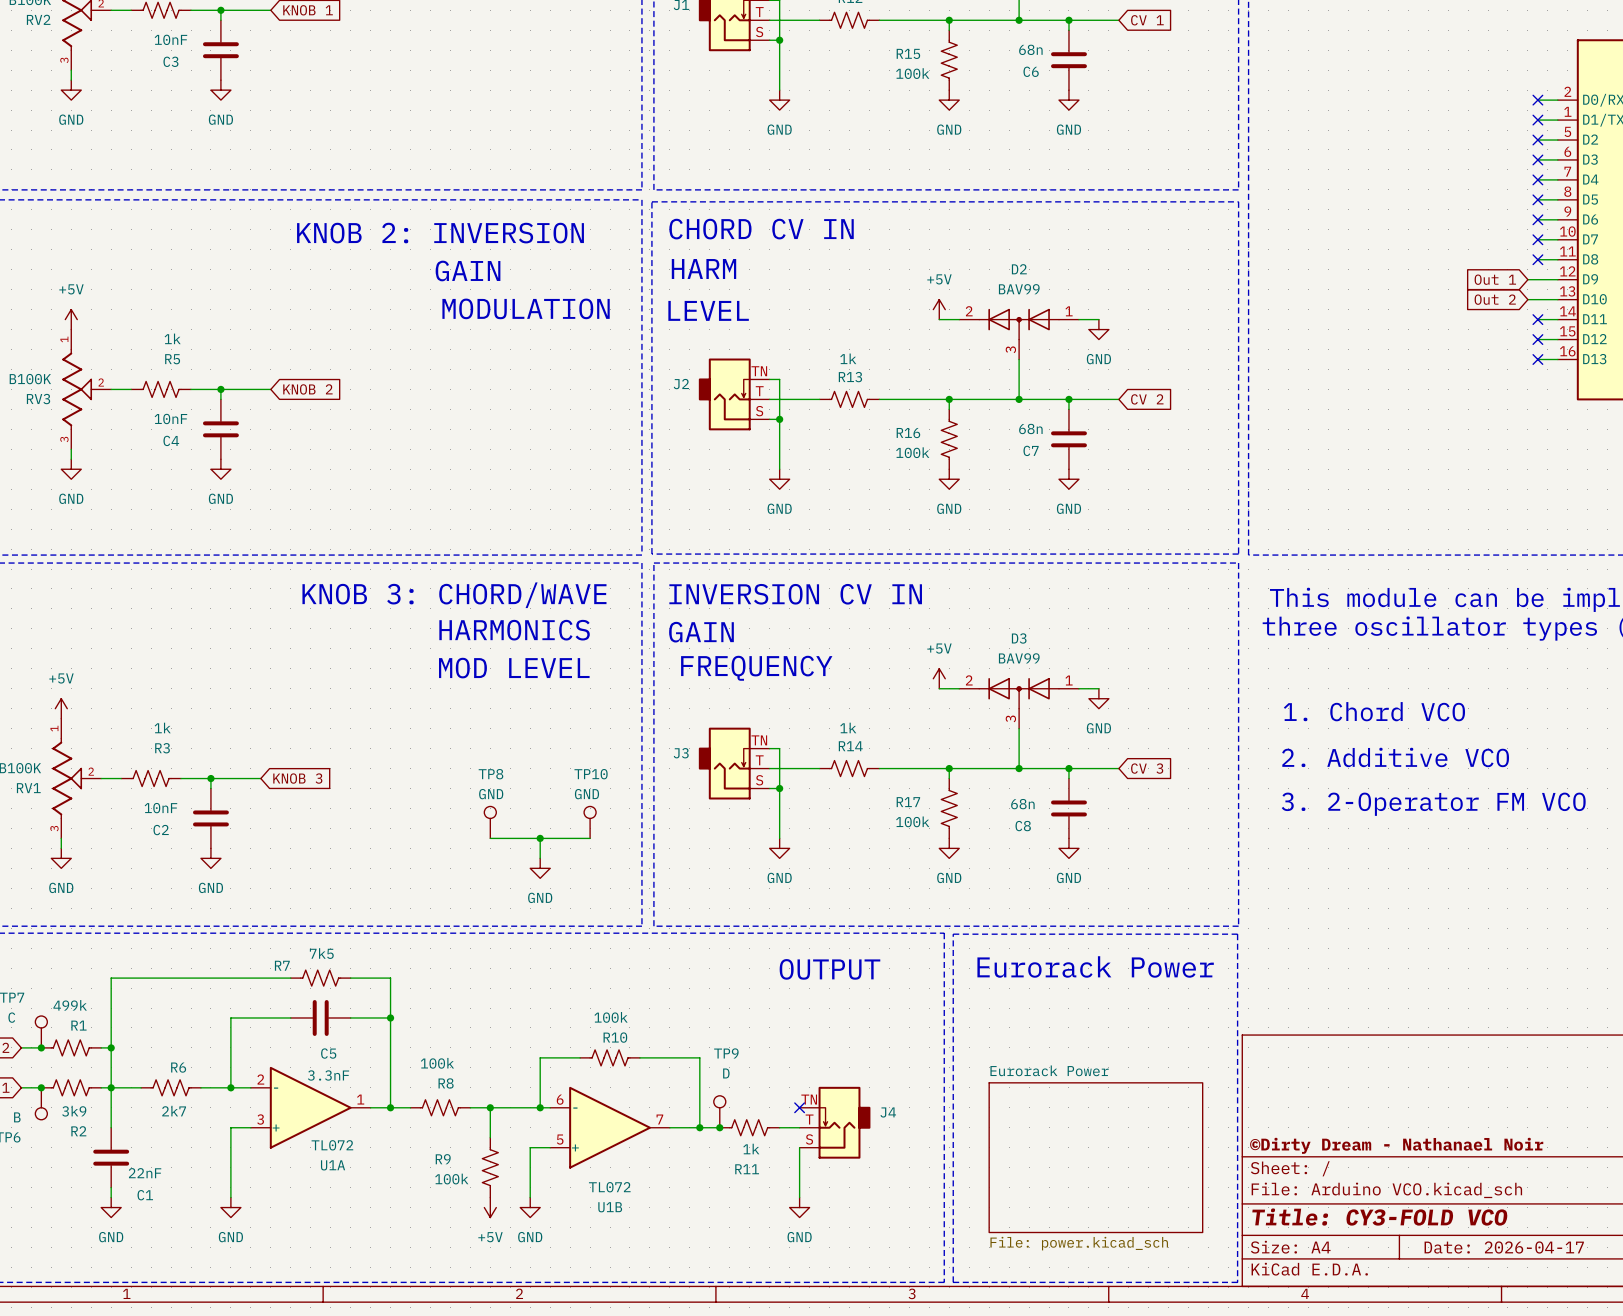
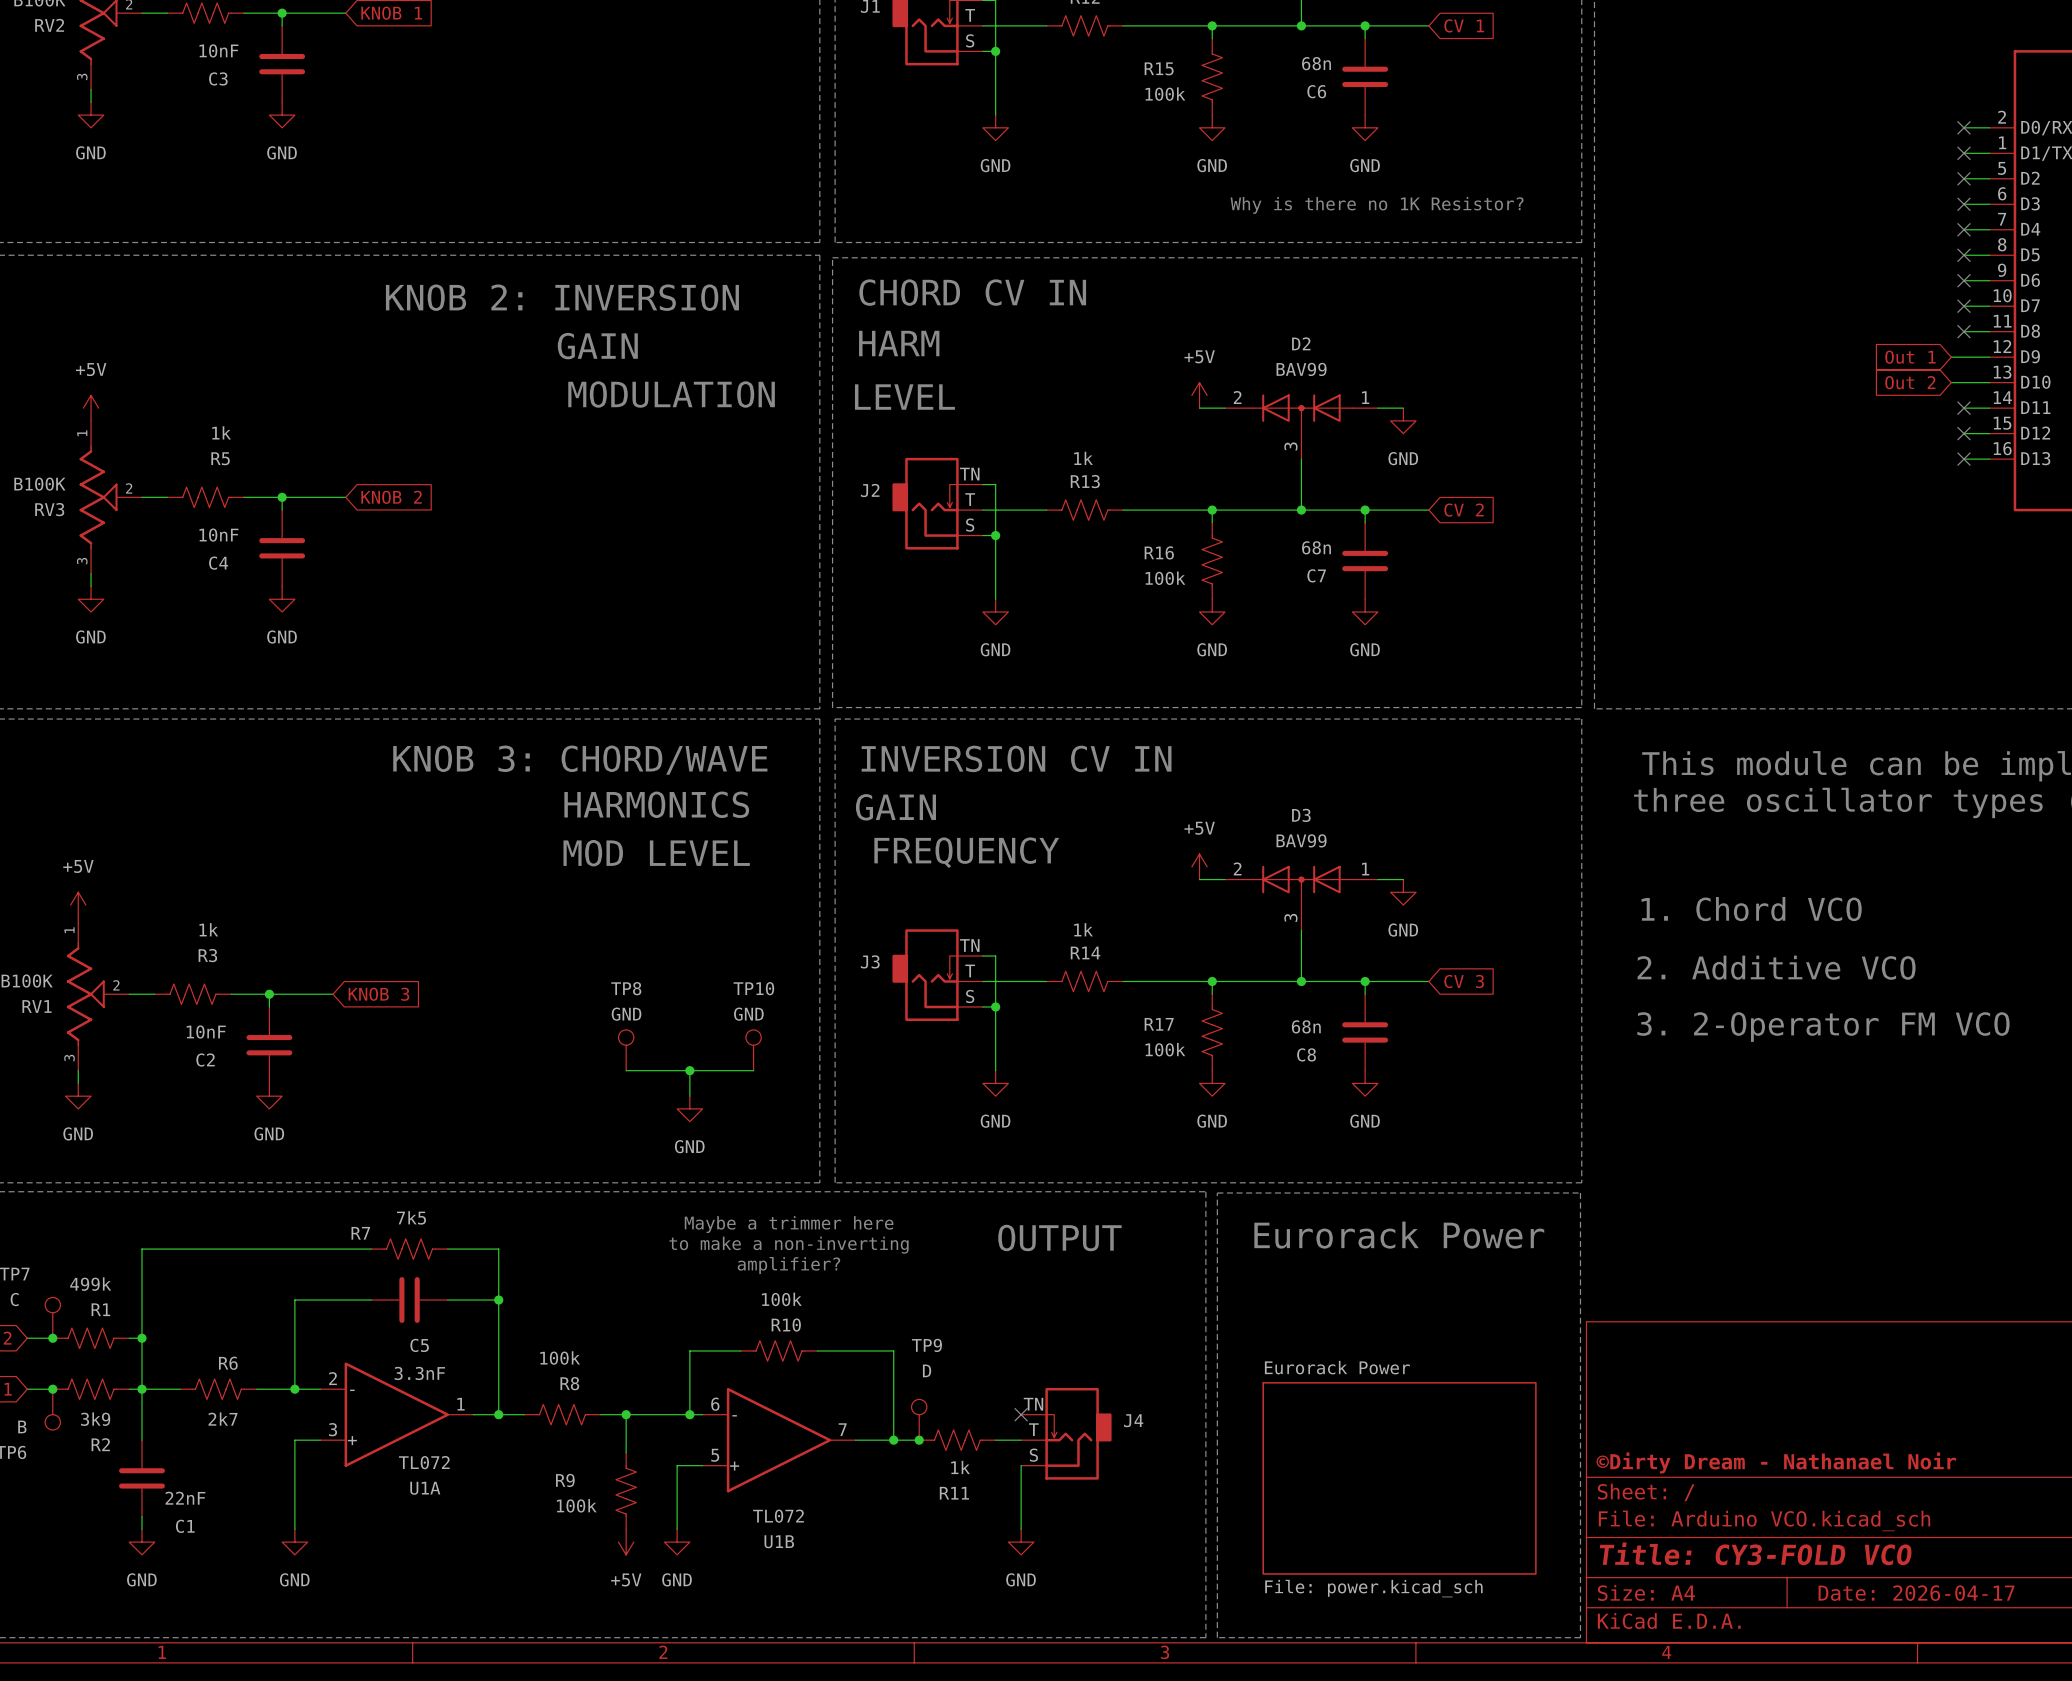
text: none -> Why is there no 1K Resistor? (1377, 205)
text: none -> Maybe a trimmer here (789, 1224)
text: none -> to make a non-inverting (788, 1245)
text: none -> amplifier? (788, 1265)

